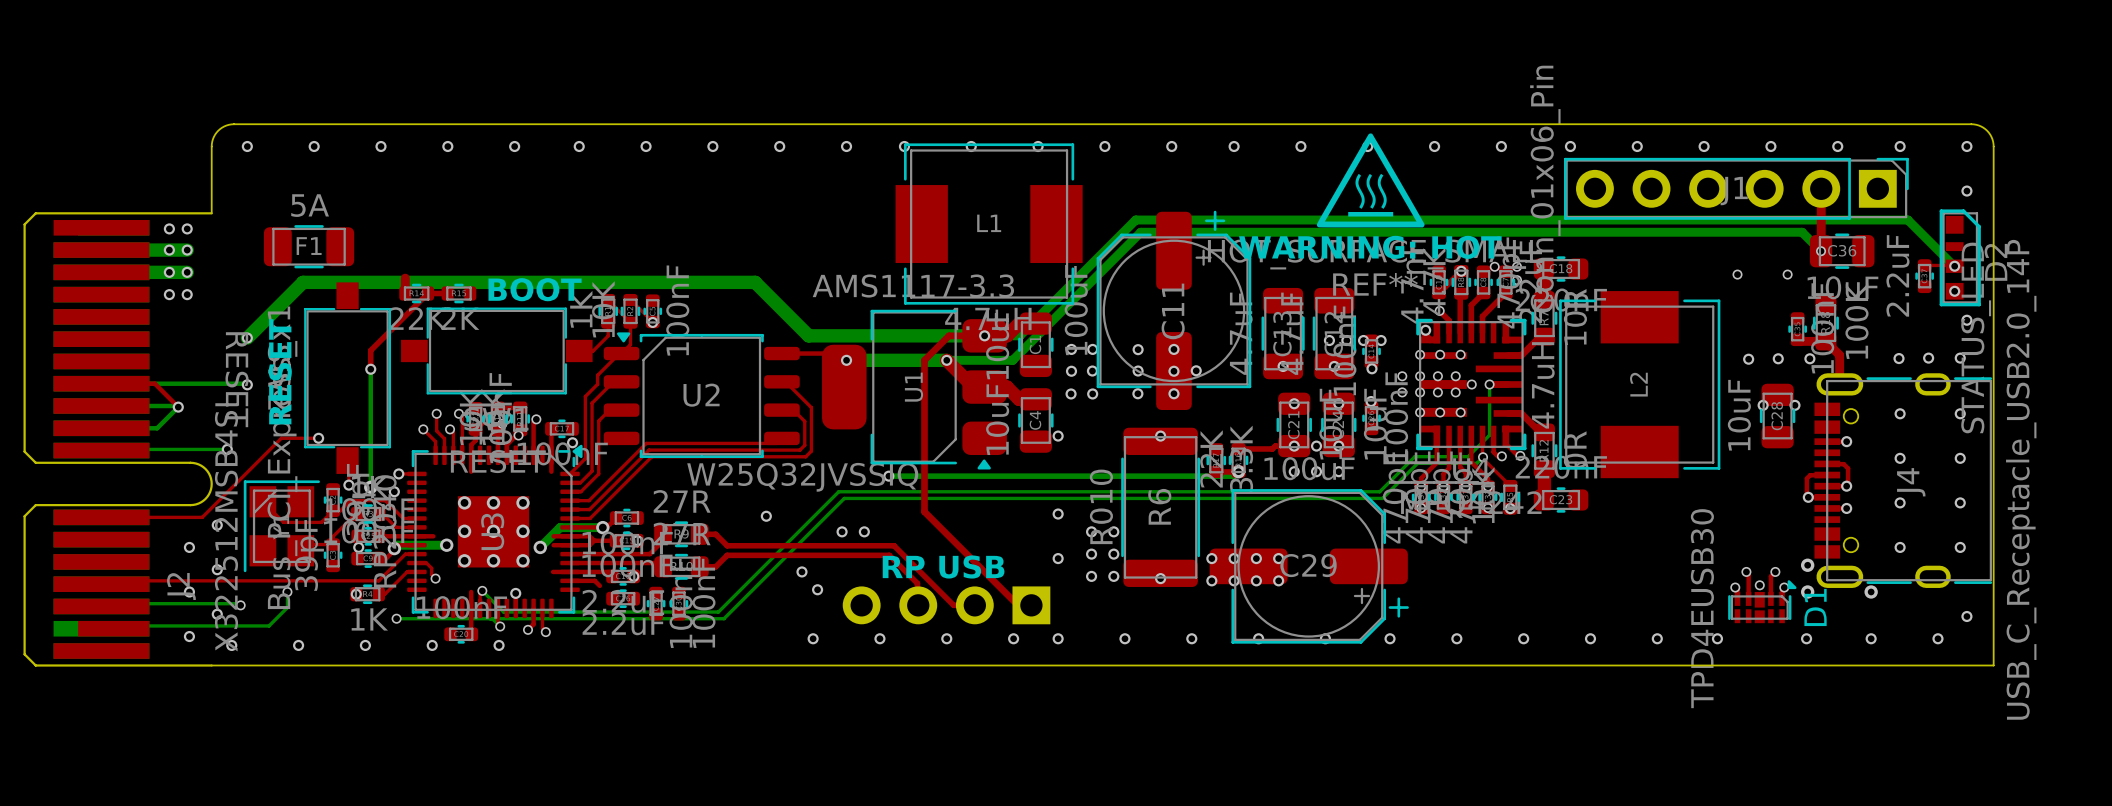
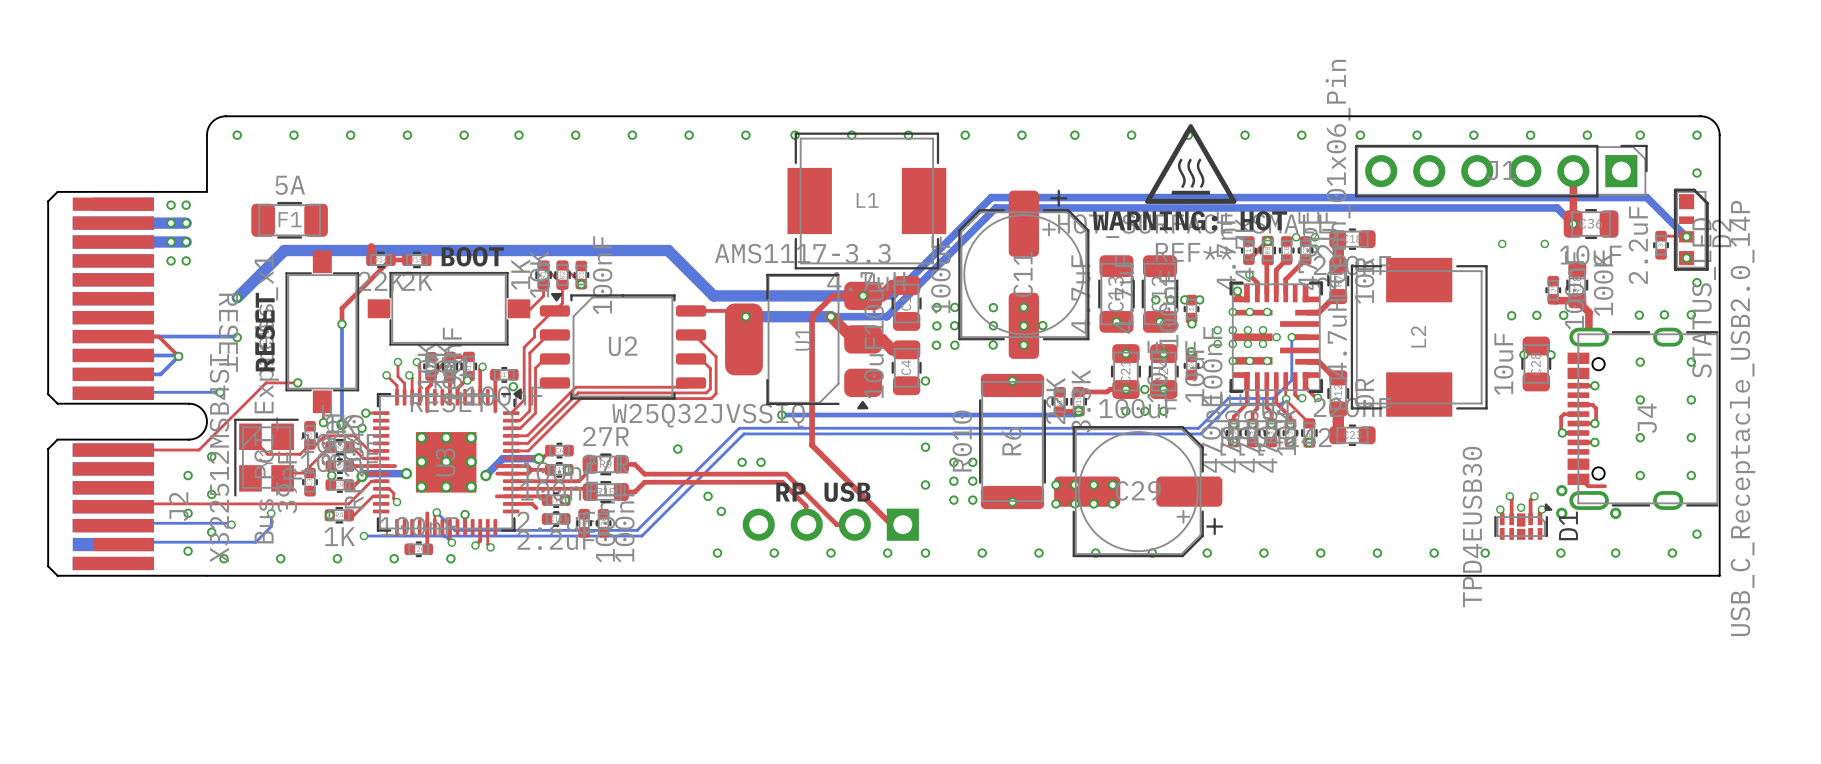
top track: none -> (1578, 476) (1588, 486) (1605, 486)

